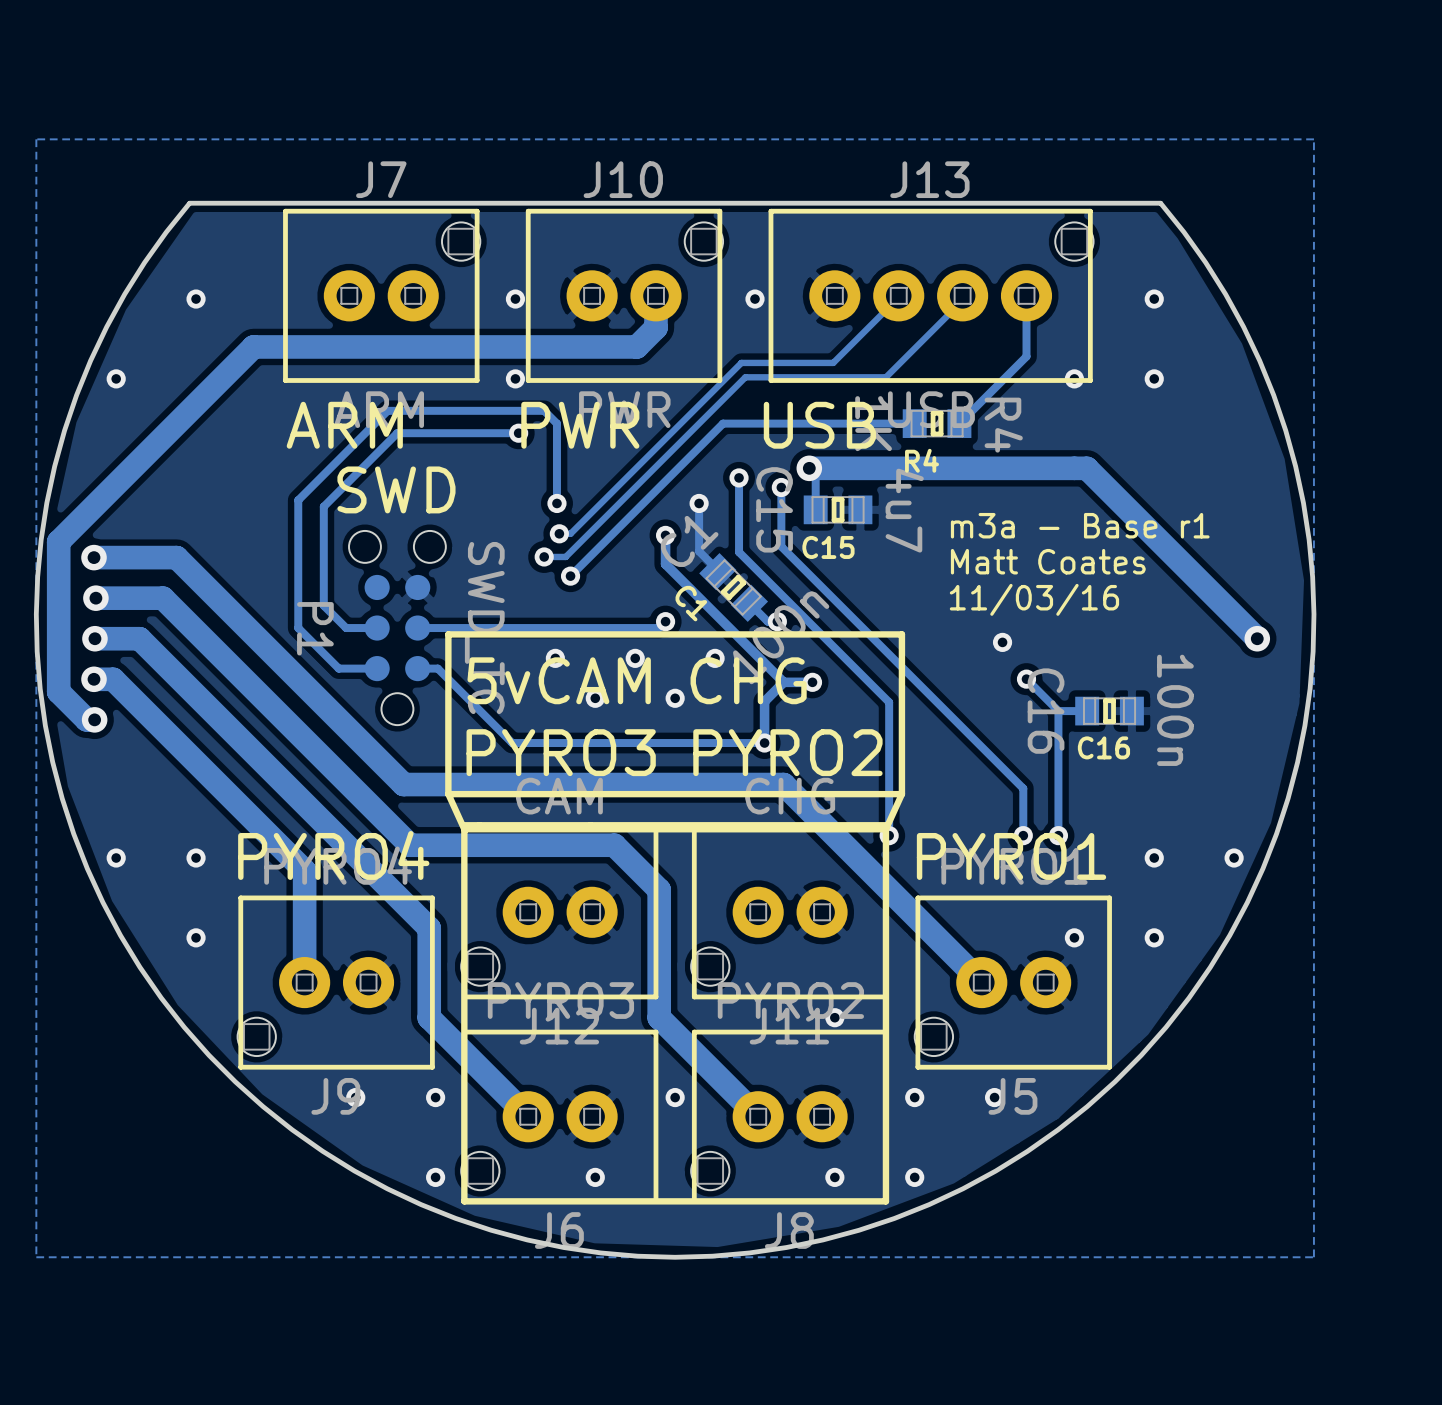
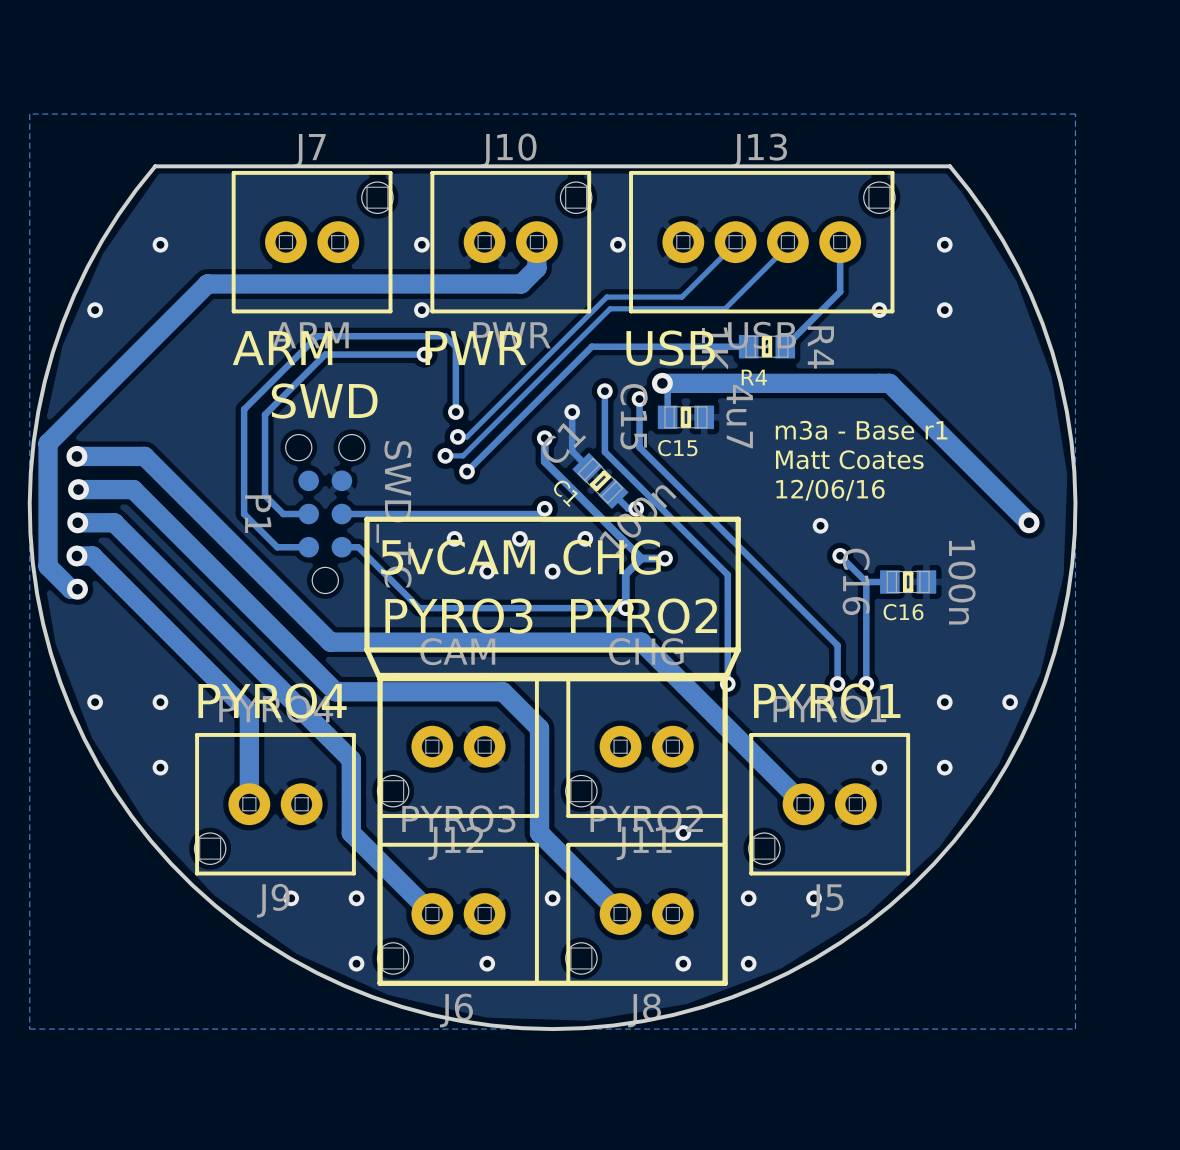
text: 11/03/16 (1034, 599) -> 12/06/16 (830, 490)

